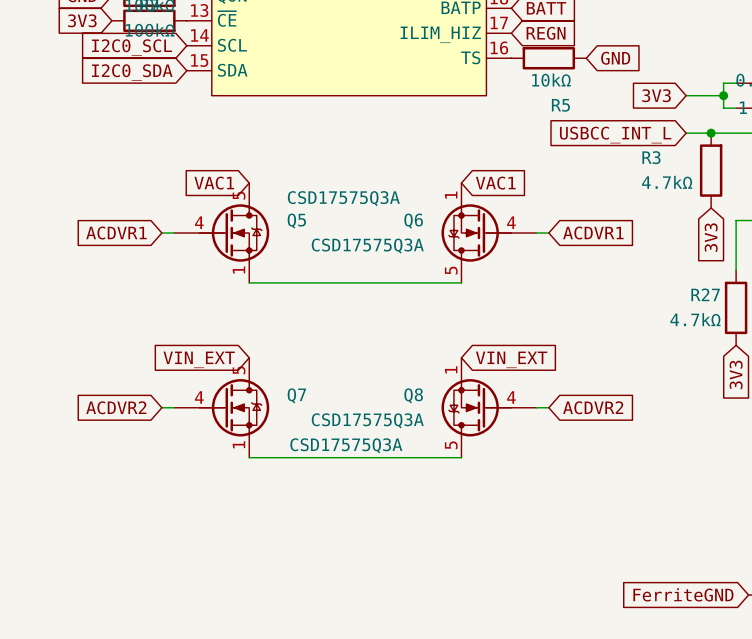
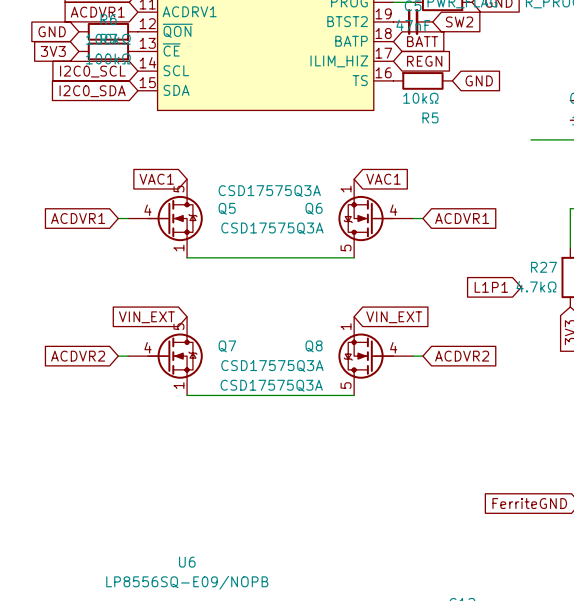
wire: (736, 83) (723, 83) (723, 108) (736, 108) -> none
global label: 3V3 (656, 95) -> none
wire: (686, 95) (723, 95) -> none
junction: (723, 95) -> none
junction: (711, 133) -> none
global label: USBCC_INT_L (615, 135) -> none
R3: 4.7kΩ (711, 170) -> none
global label: 3V3 (711, 237) -> none
global label: none -> L1P1 (491, 287)

